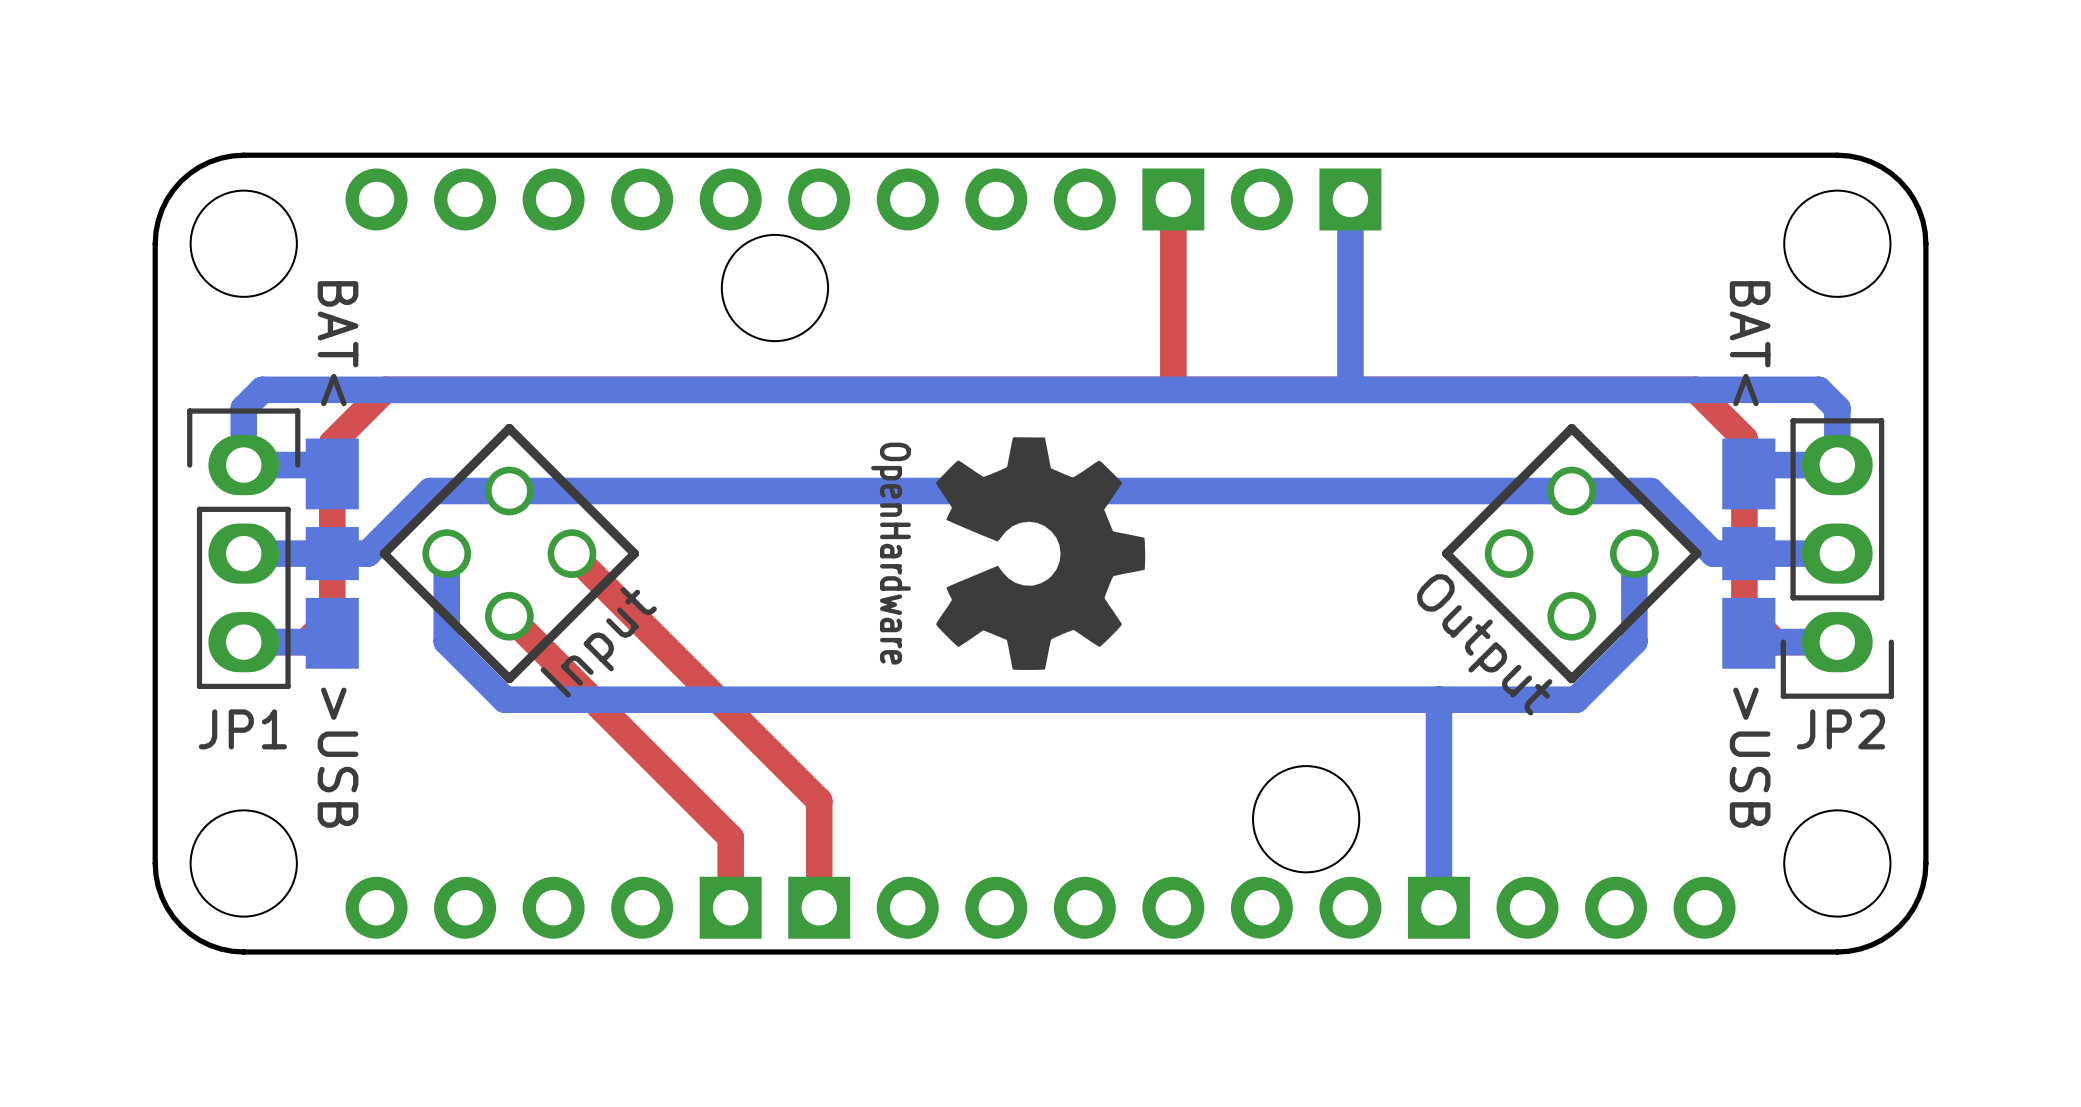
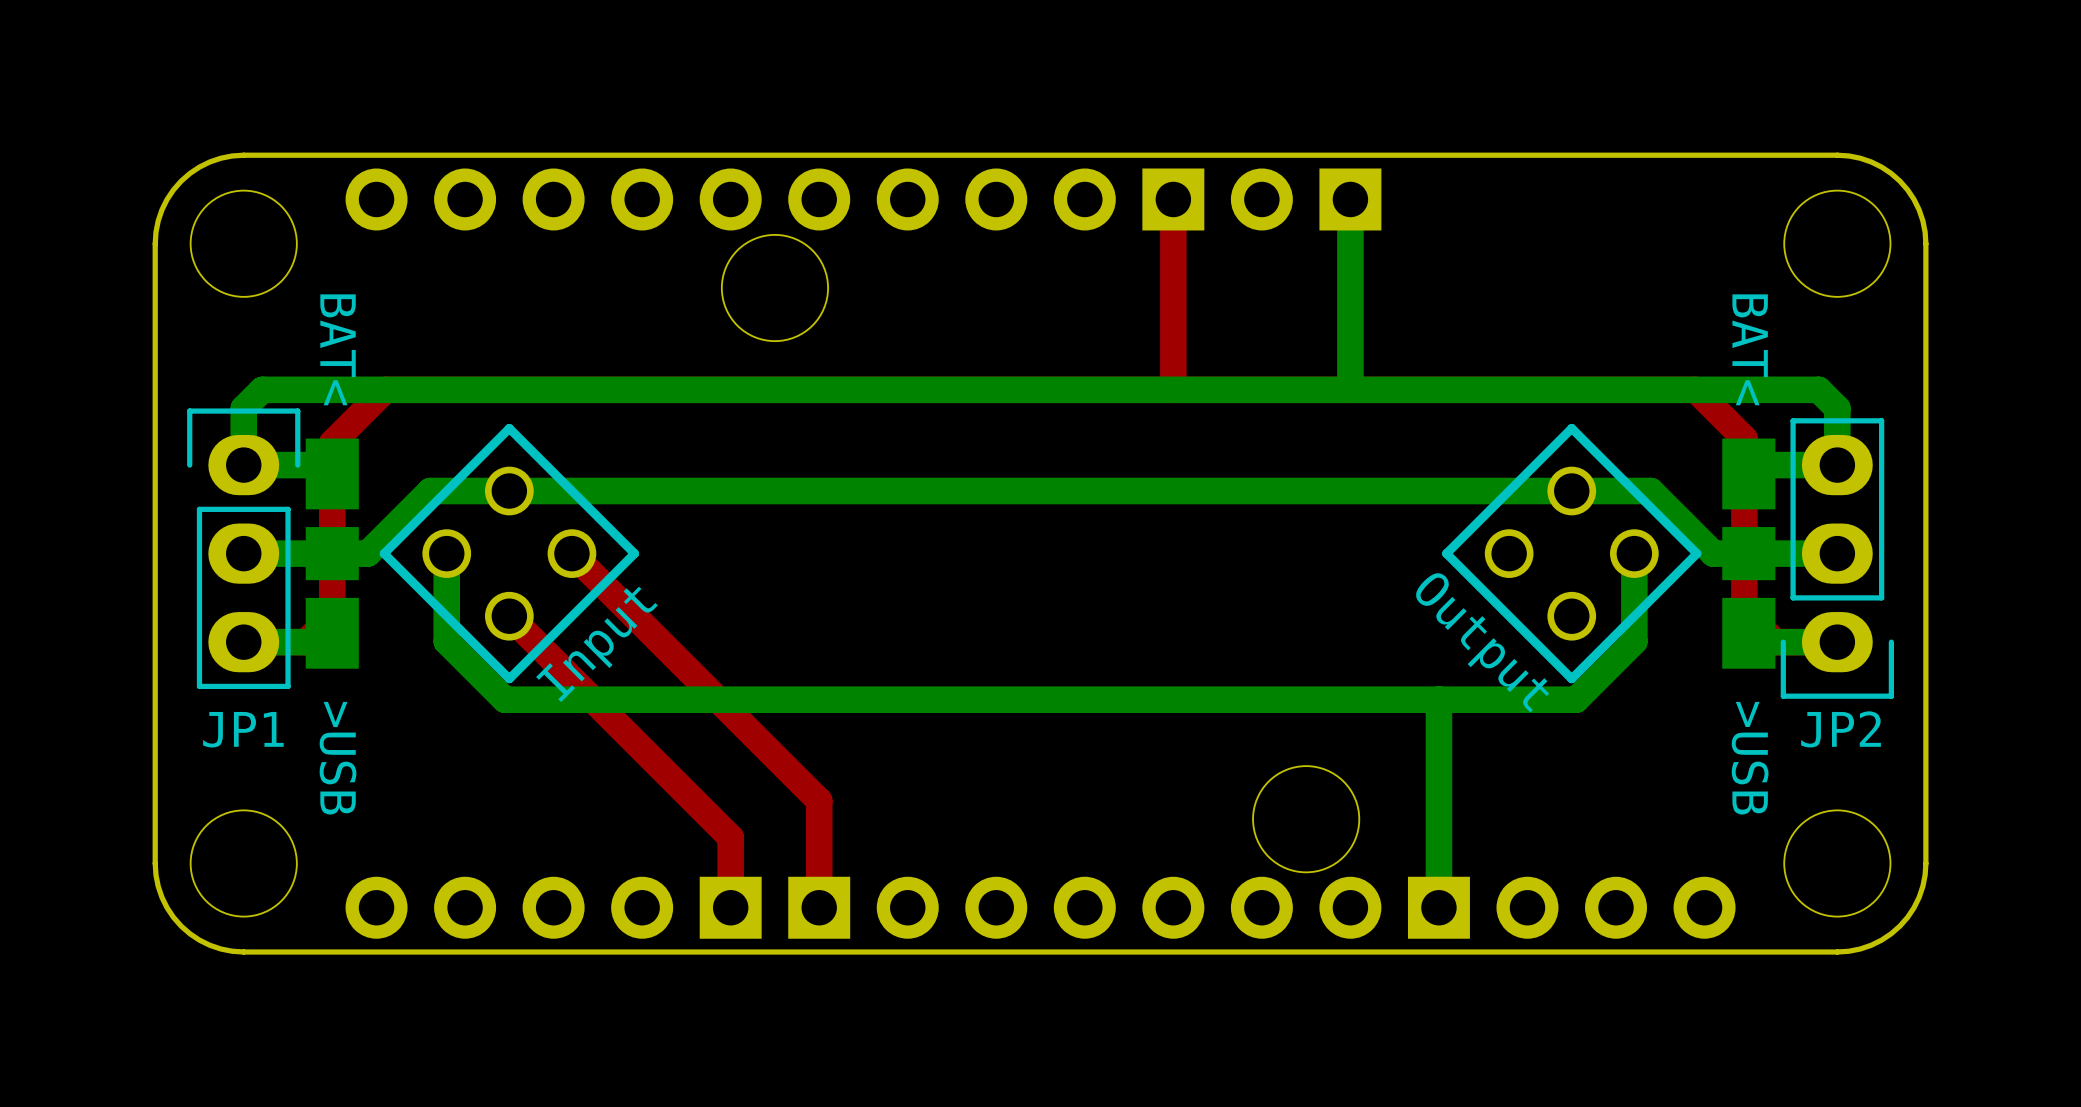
drawing: [935, 437, 1146, 670] -> none

